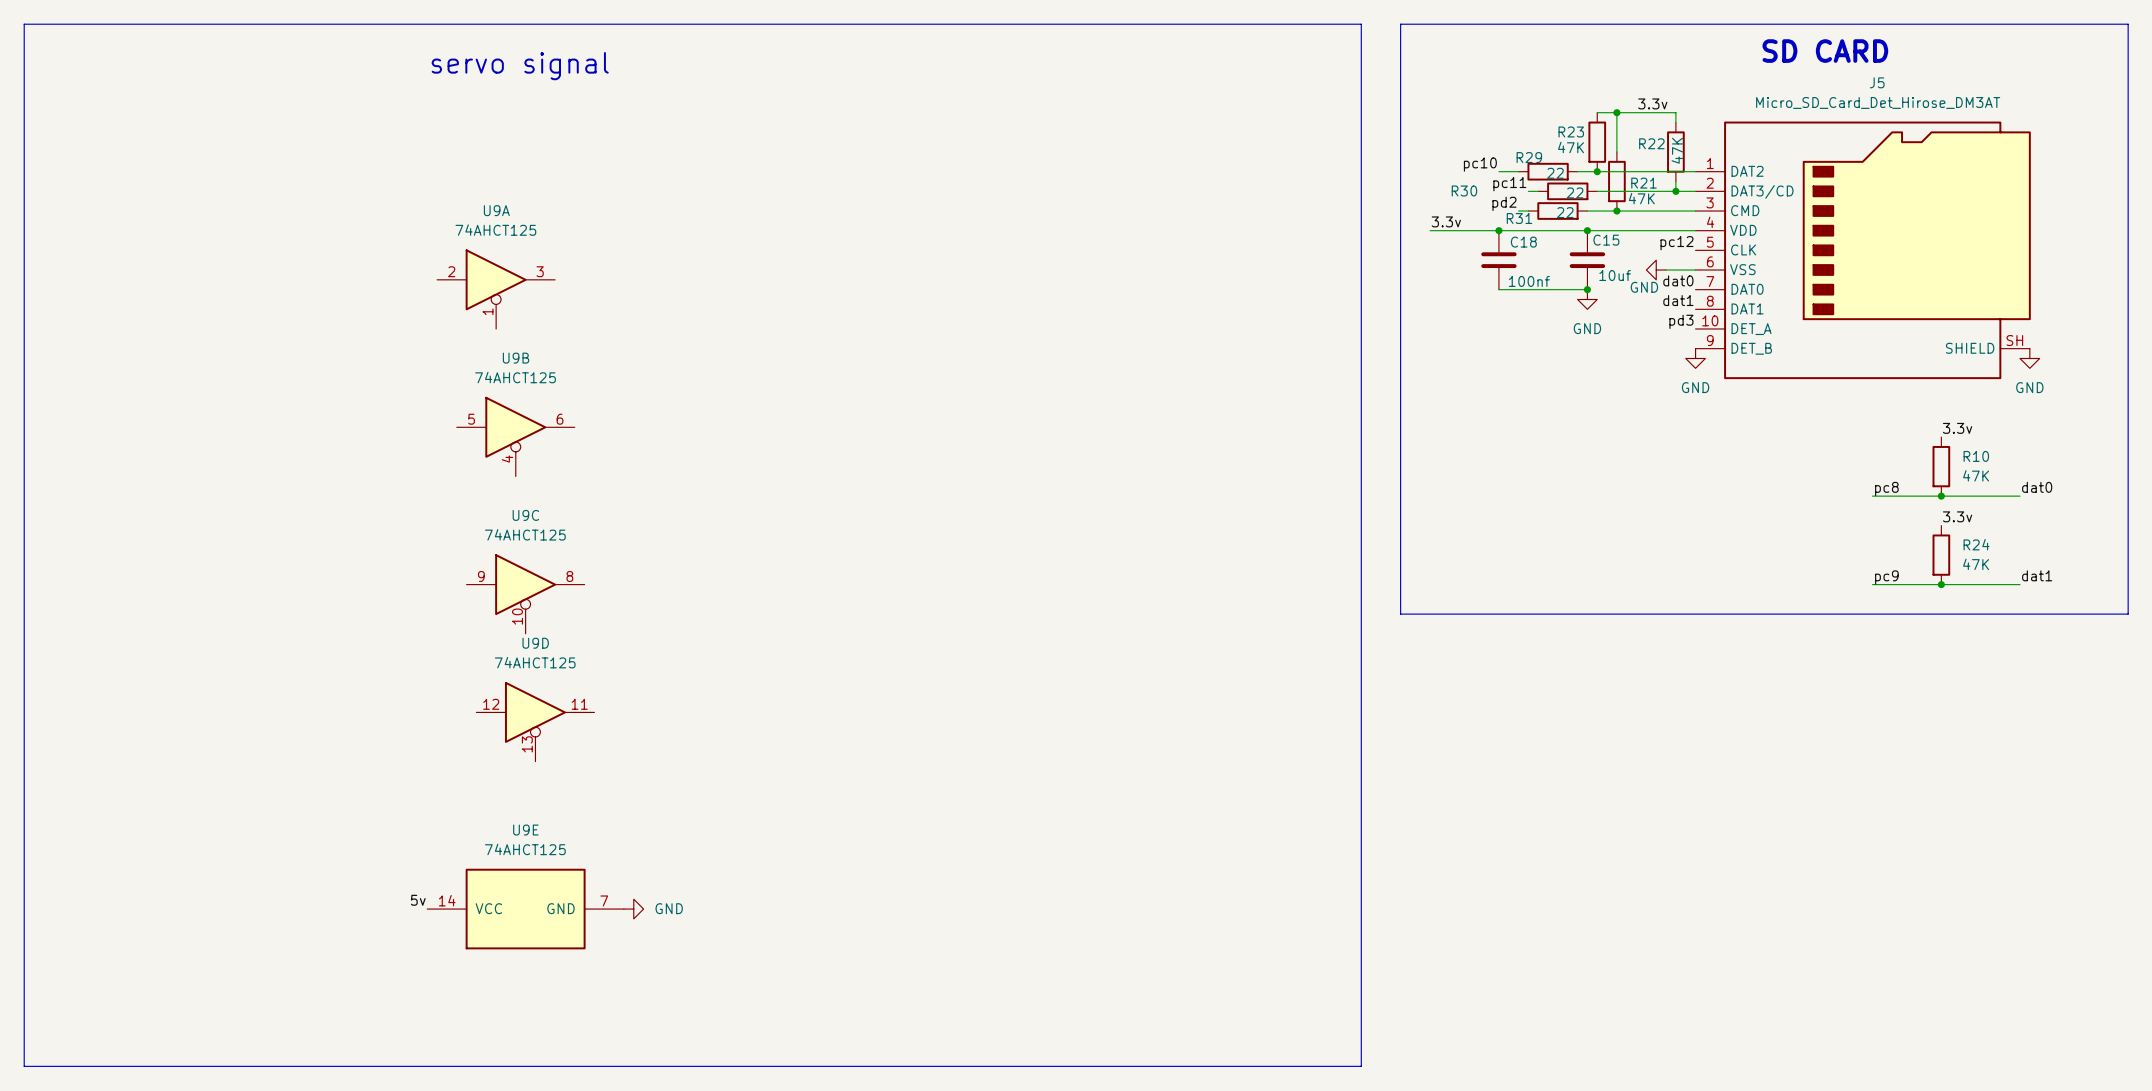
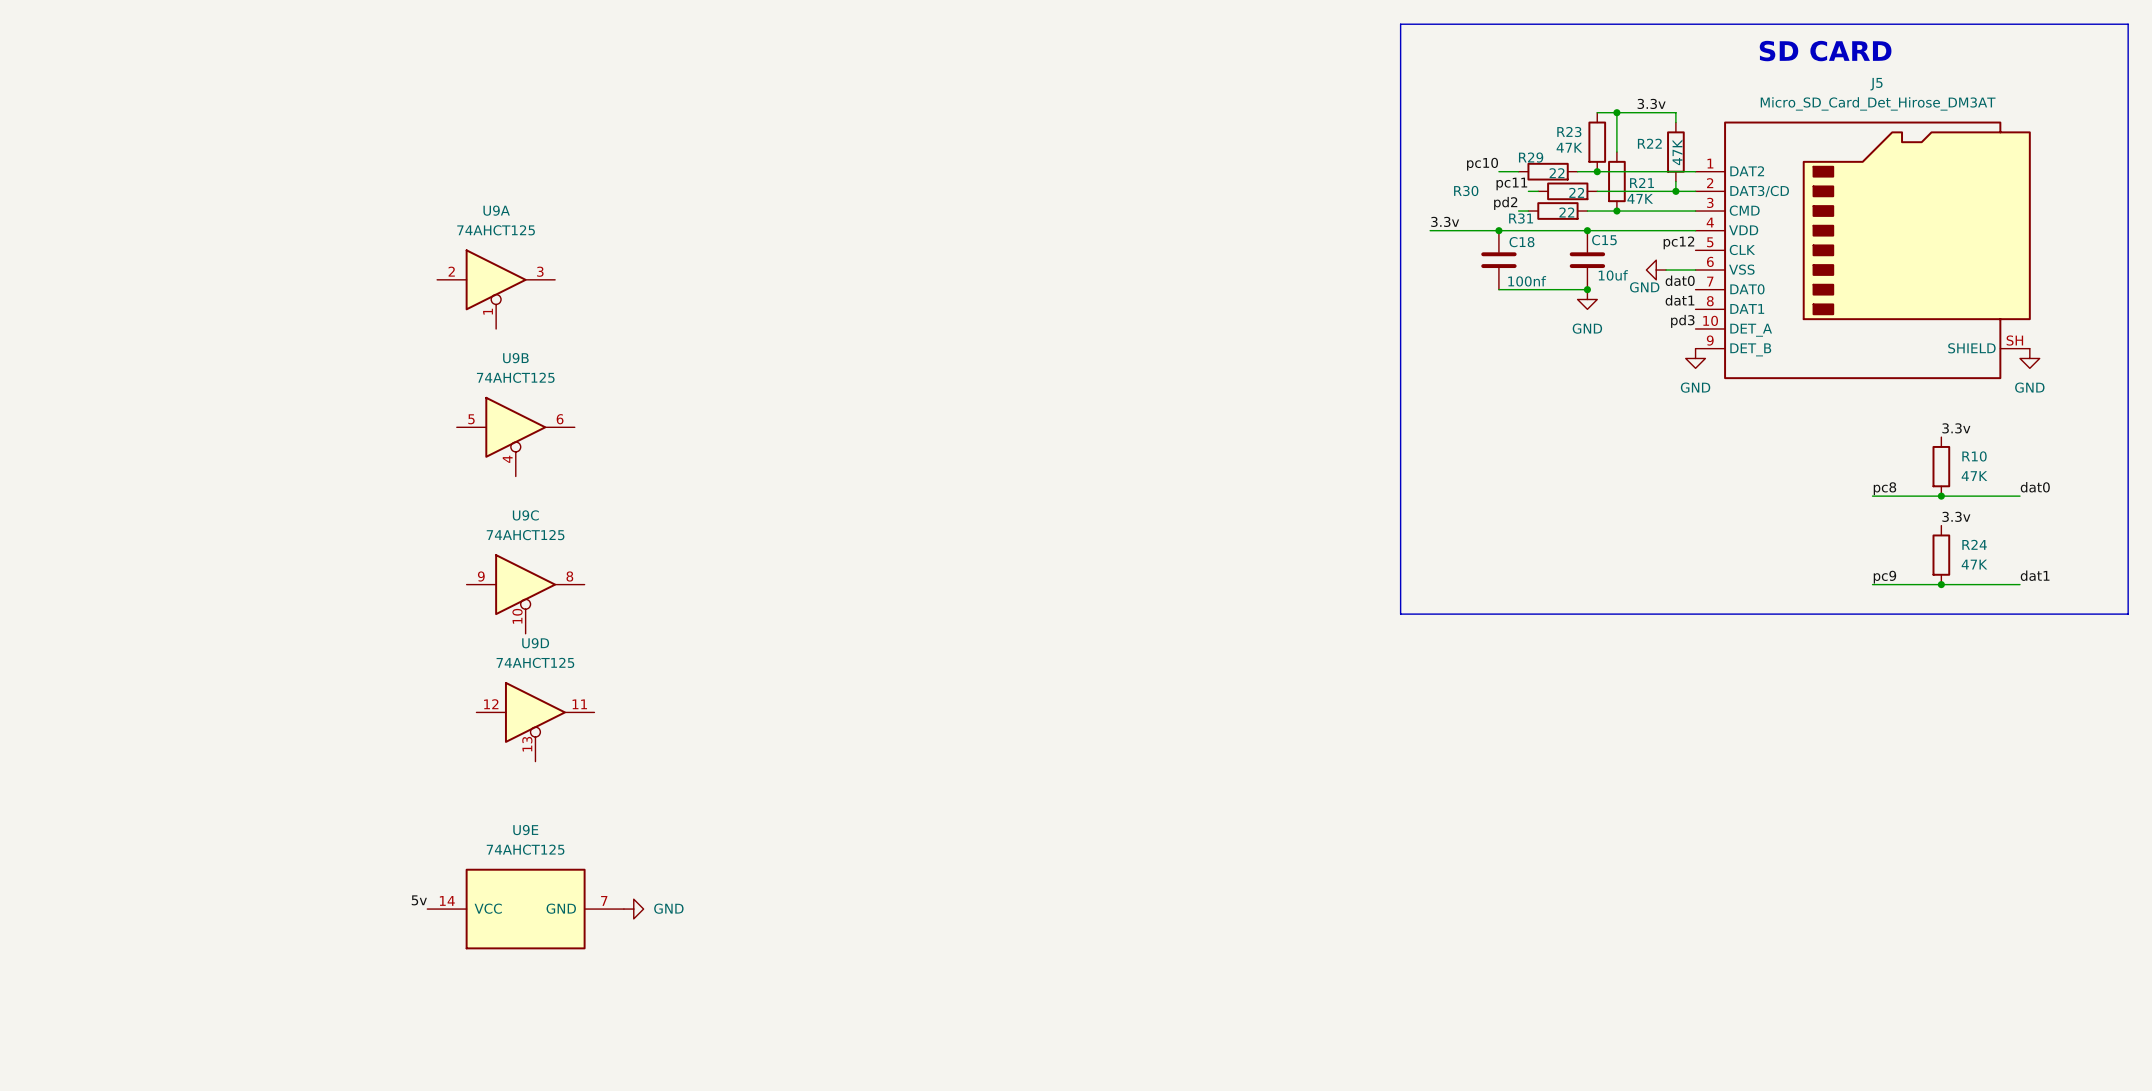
line: (24, 24) (1361, 24) (1361, 1066) (24, 1066) (24, 24) -> none
text: servo signal (520, 66) -> none

